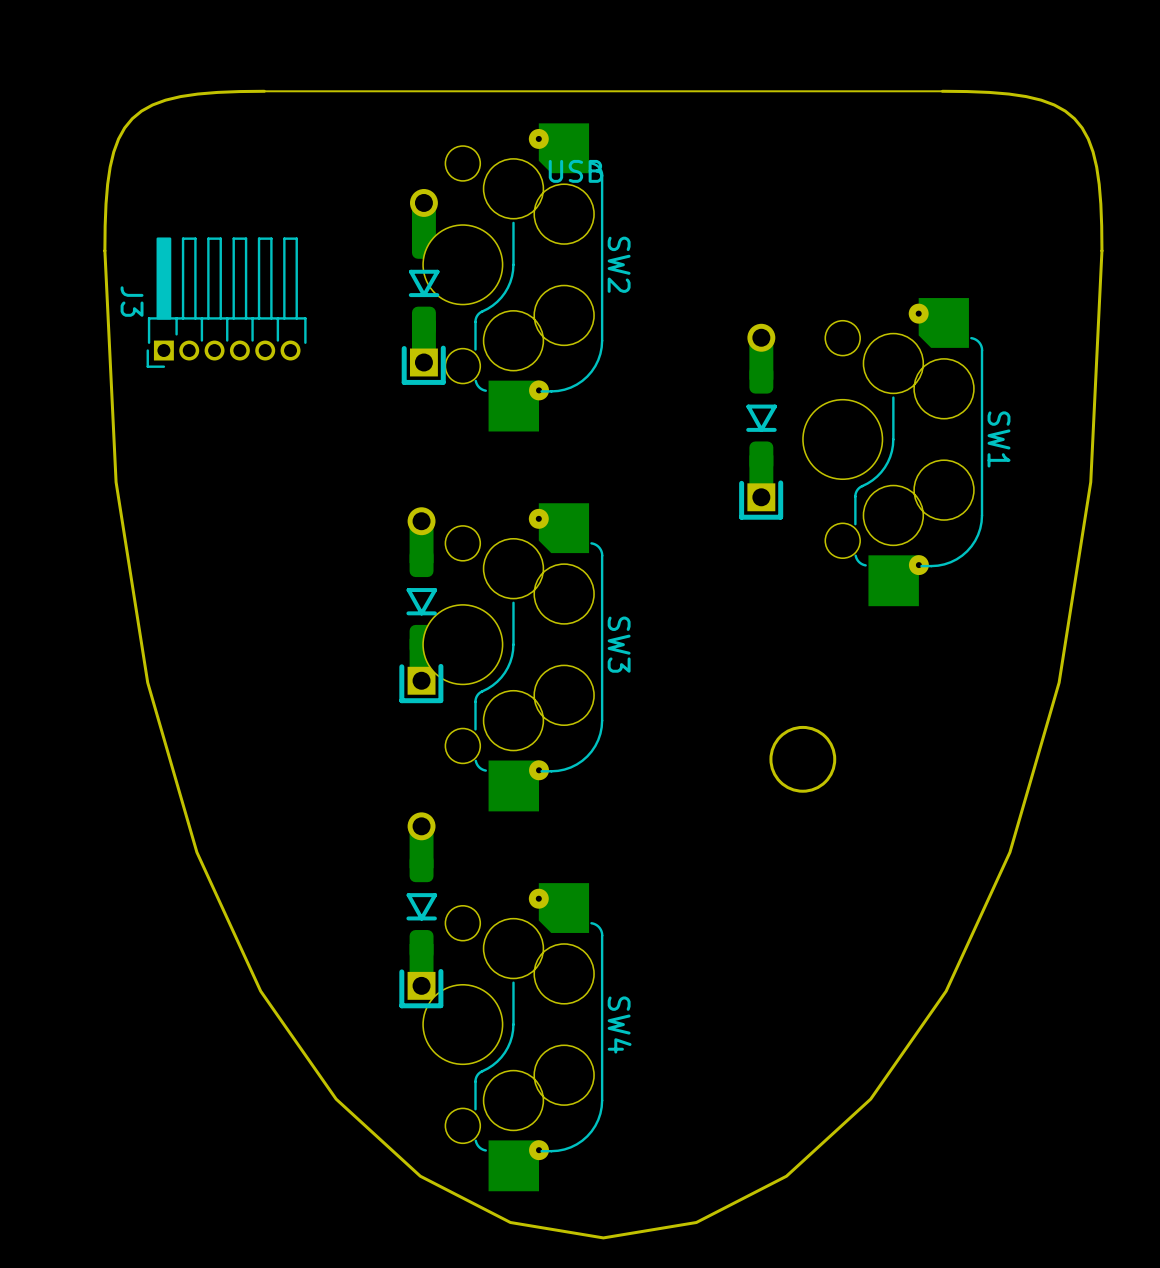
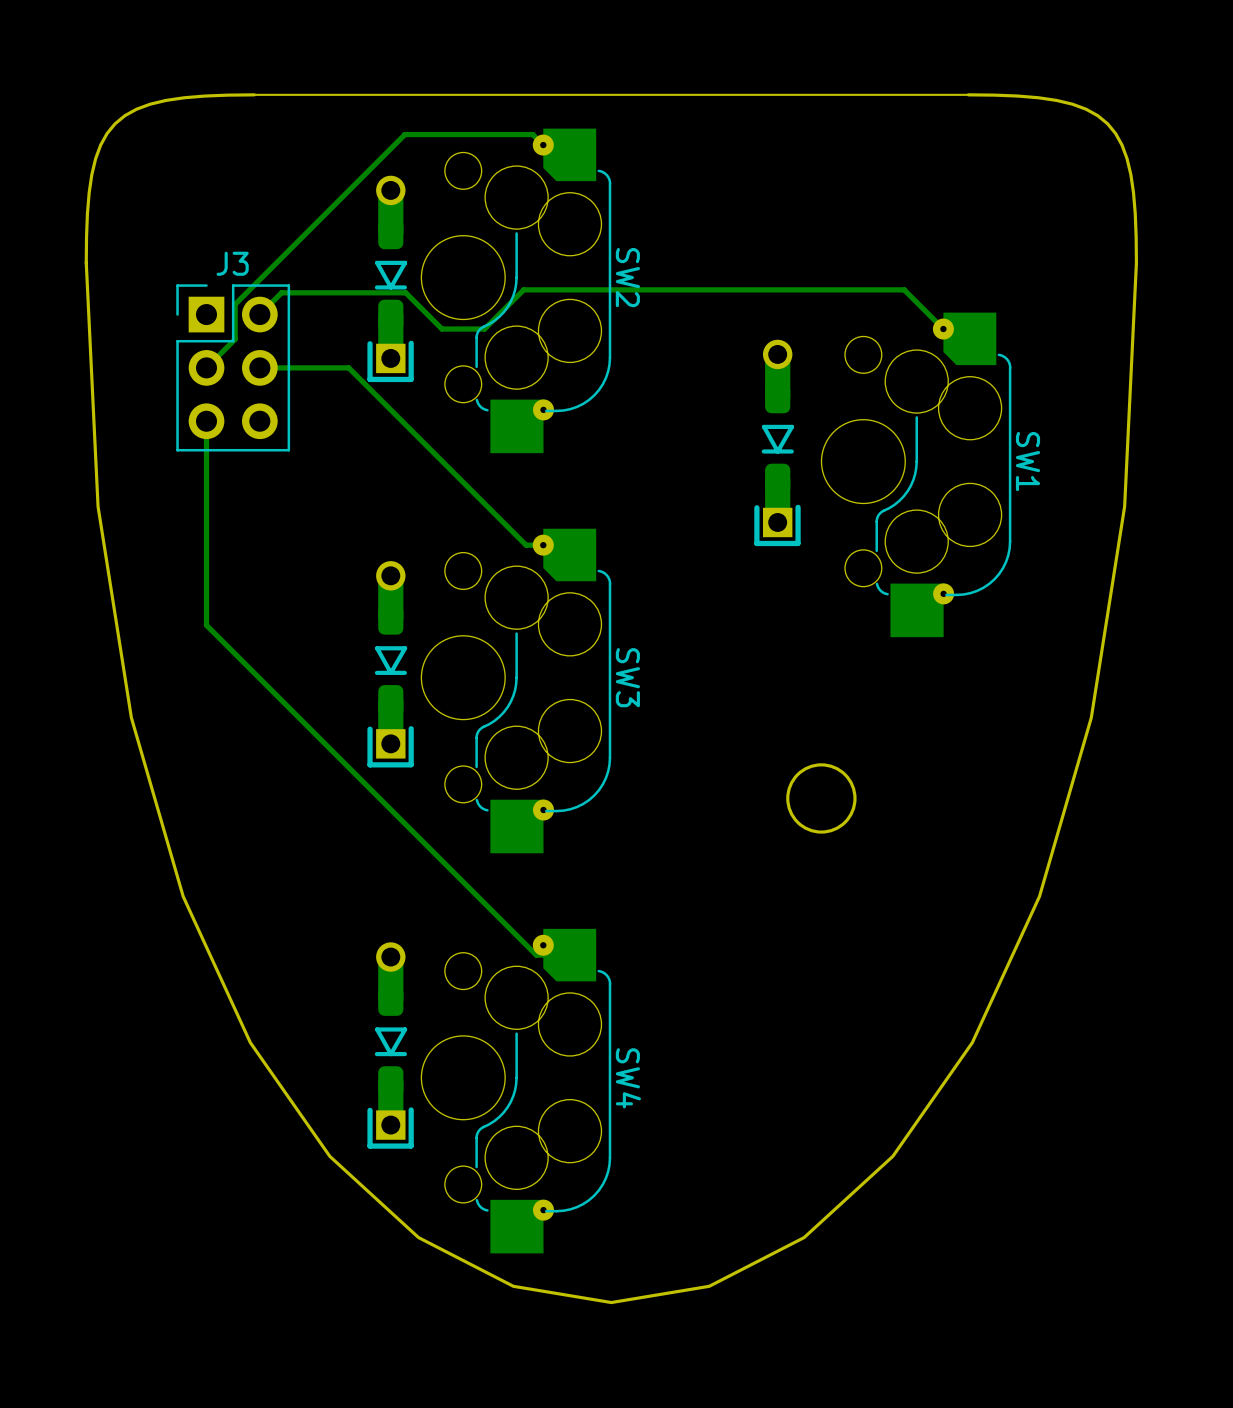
track: none -> (543, 145) (532, 134) (404, 134) (235, 304) (235, 339) (206, 367)
text: USB (575, 171) -> none
J3 footprint: [146, 237, 307, 368] -> [176, 284, 291, 452]
part position: (423, 286) -> (390, 278)
track: none -> (259, 314) (281, 292) (405, 292) (441, 329) (484, 329) (523, 289) (904, 289) (943, 329)
J3 name position: J3 (132, 301) -> J3 (232, 263)
track: none -> (259, 367) (348, 367) (526, 545) (543, 545)
track: none -> (206, 421) (206, 625) (536, 955) (569, 955)
part position: (421, 605) -> (390, 664)
part position: (421, 910) -> (390, 1045)

